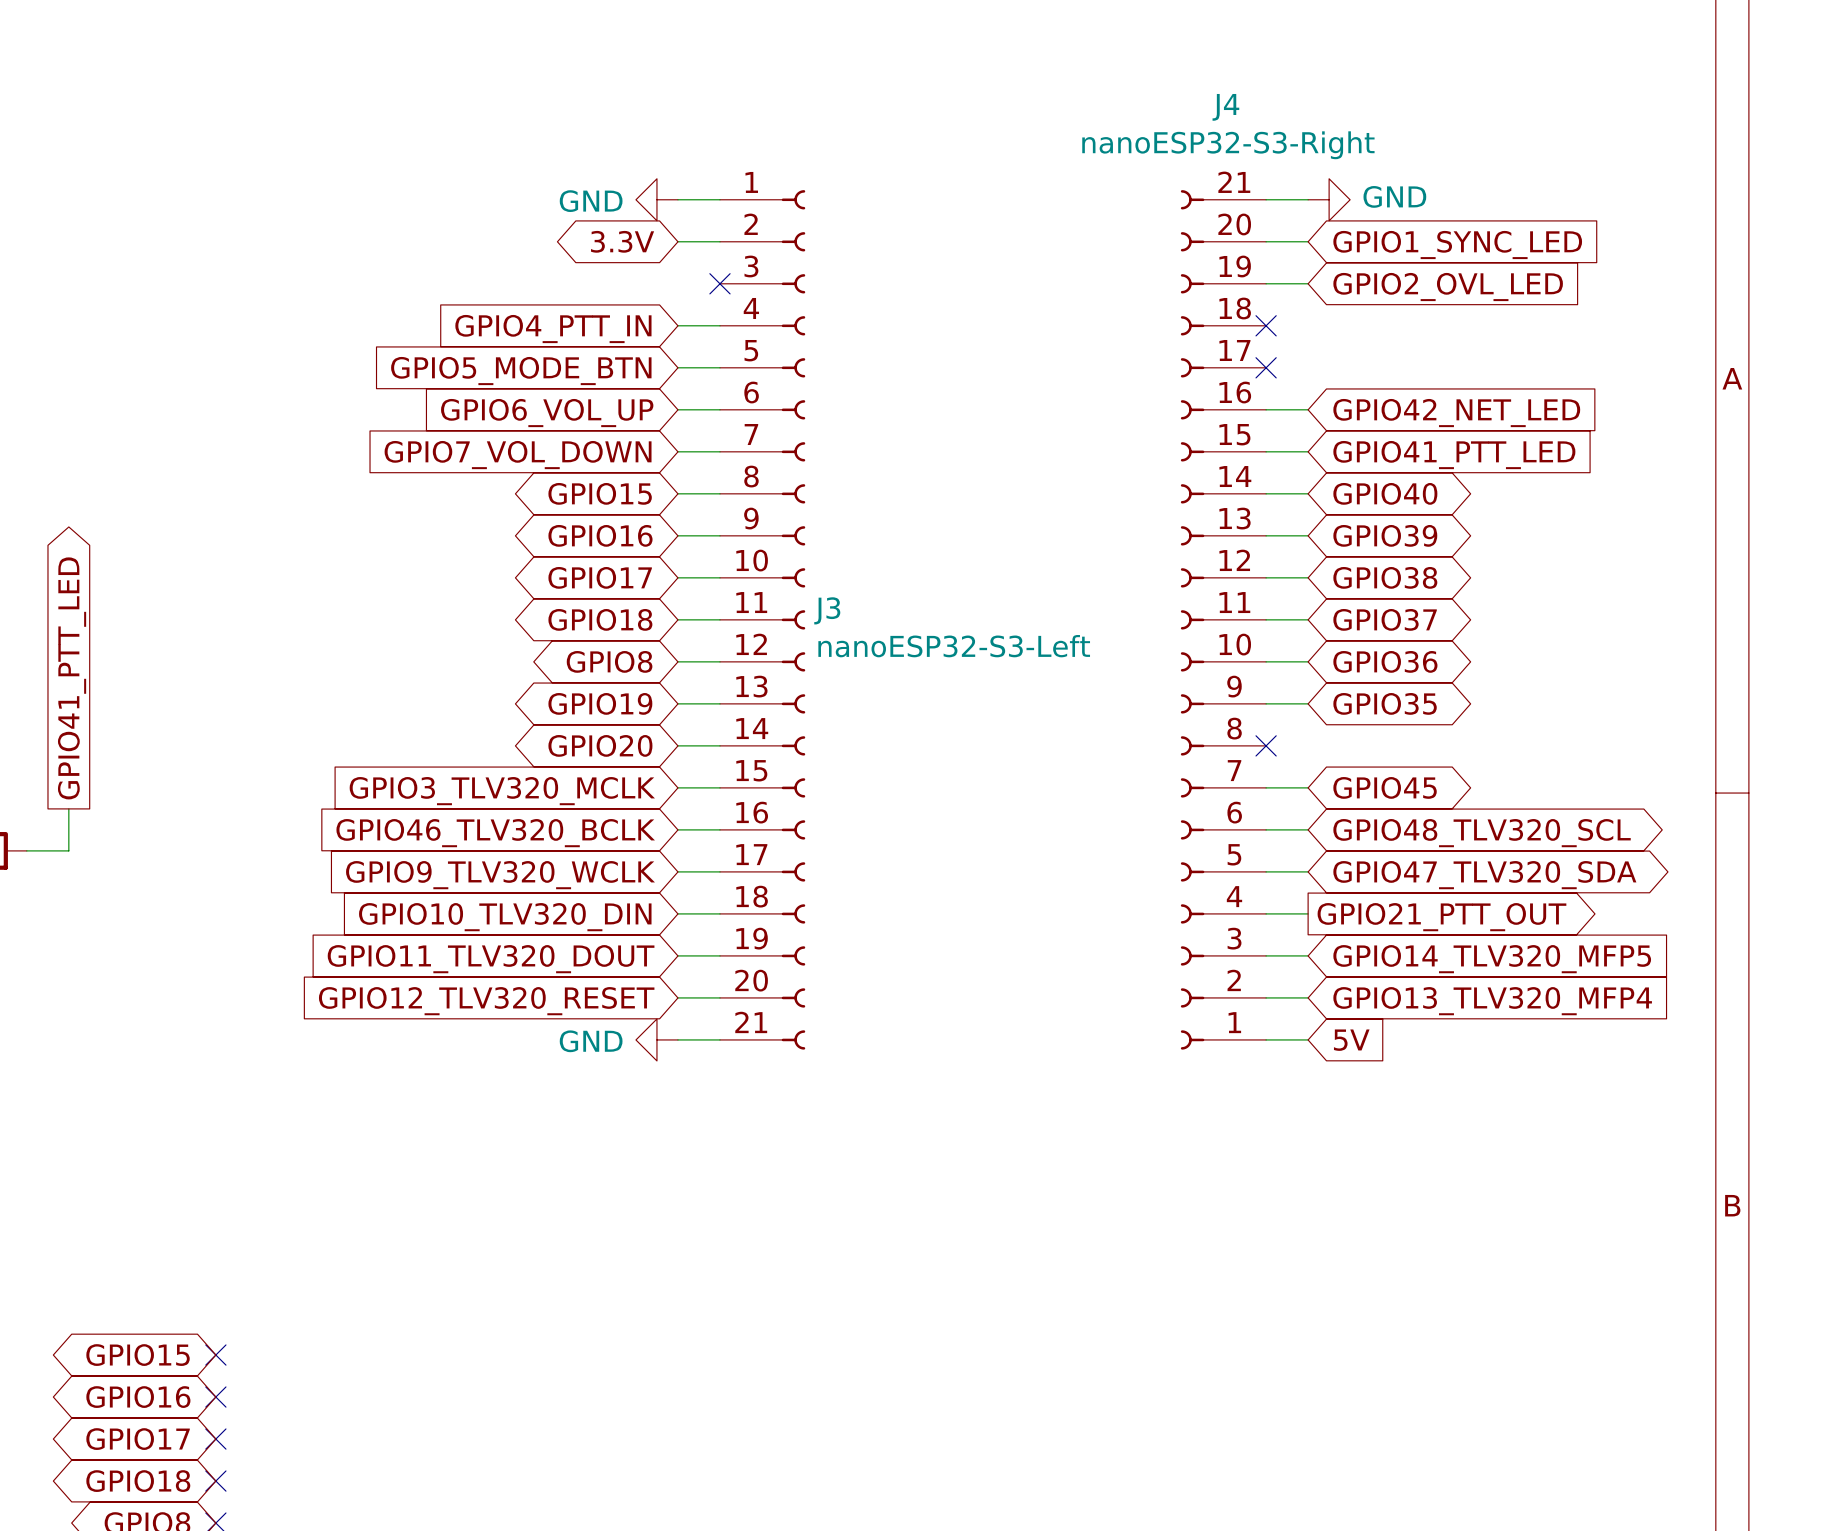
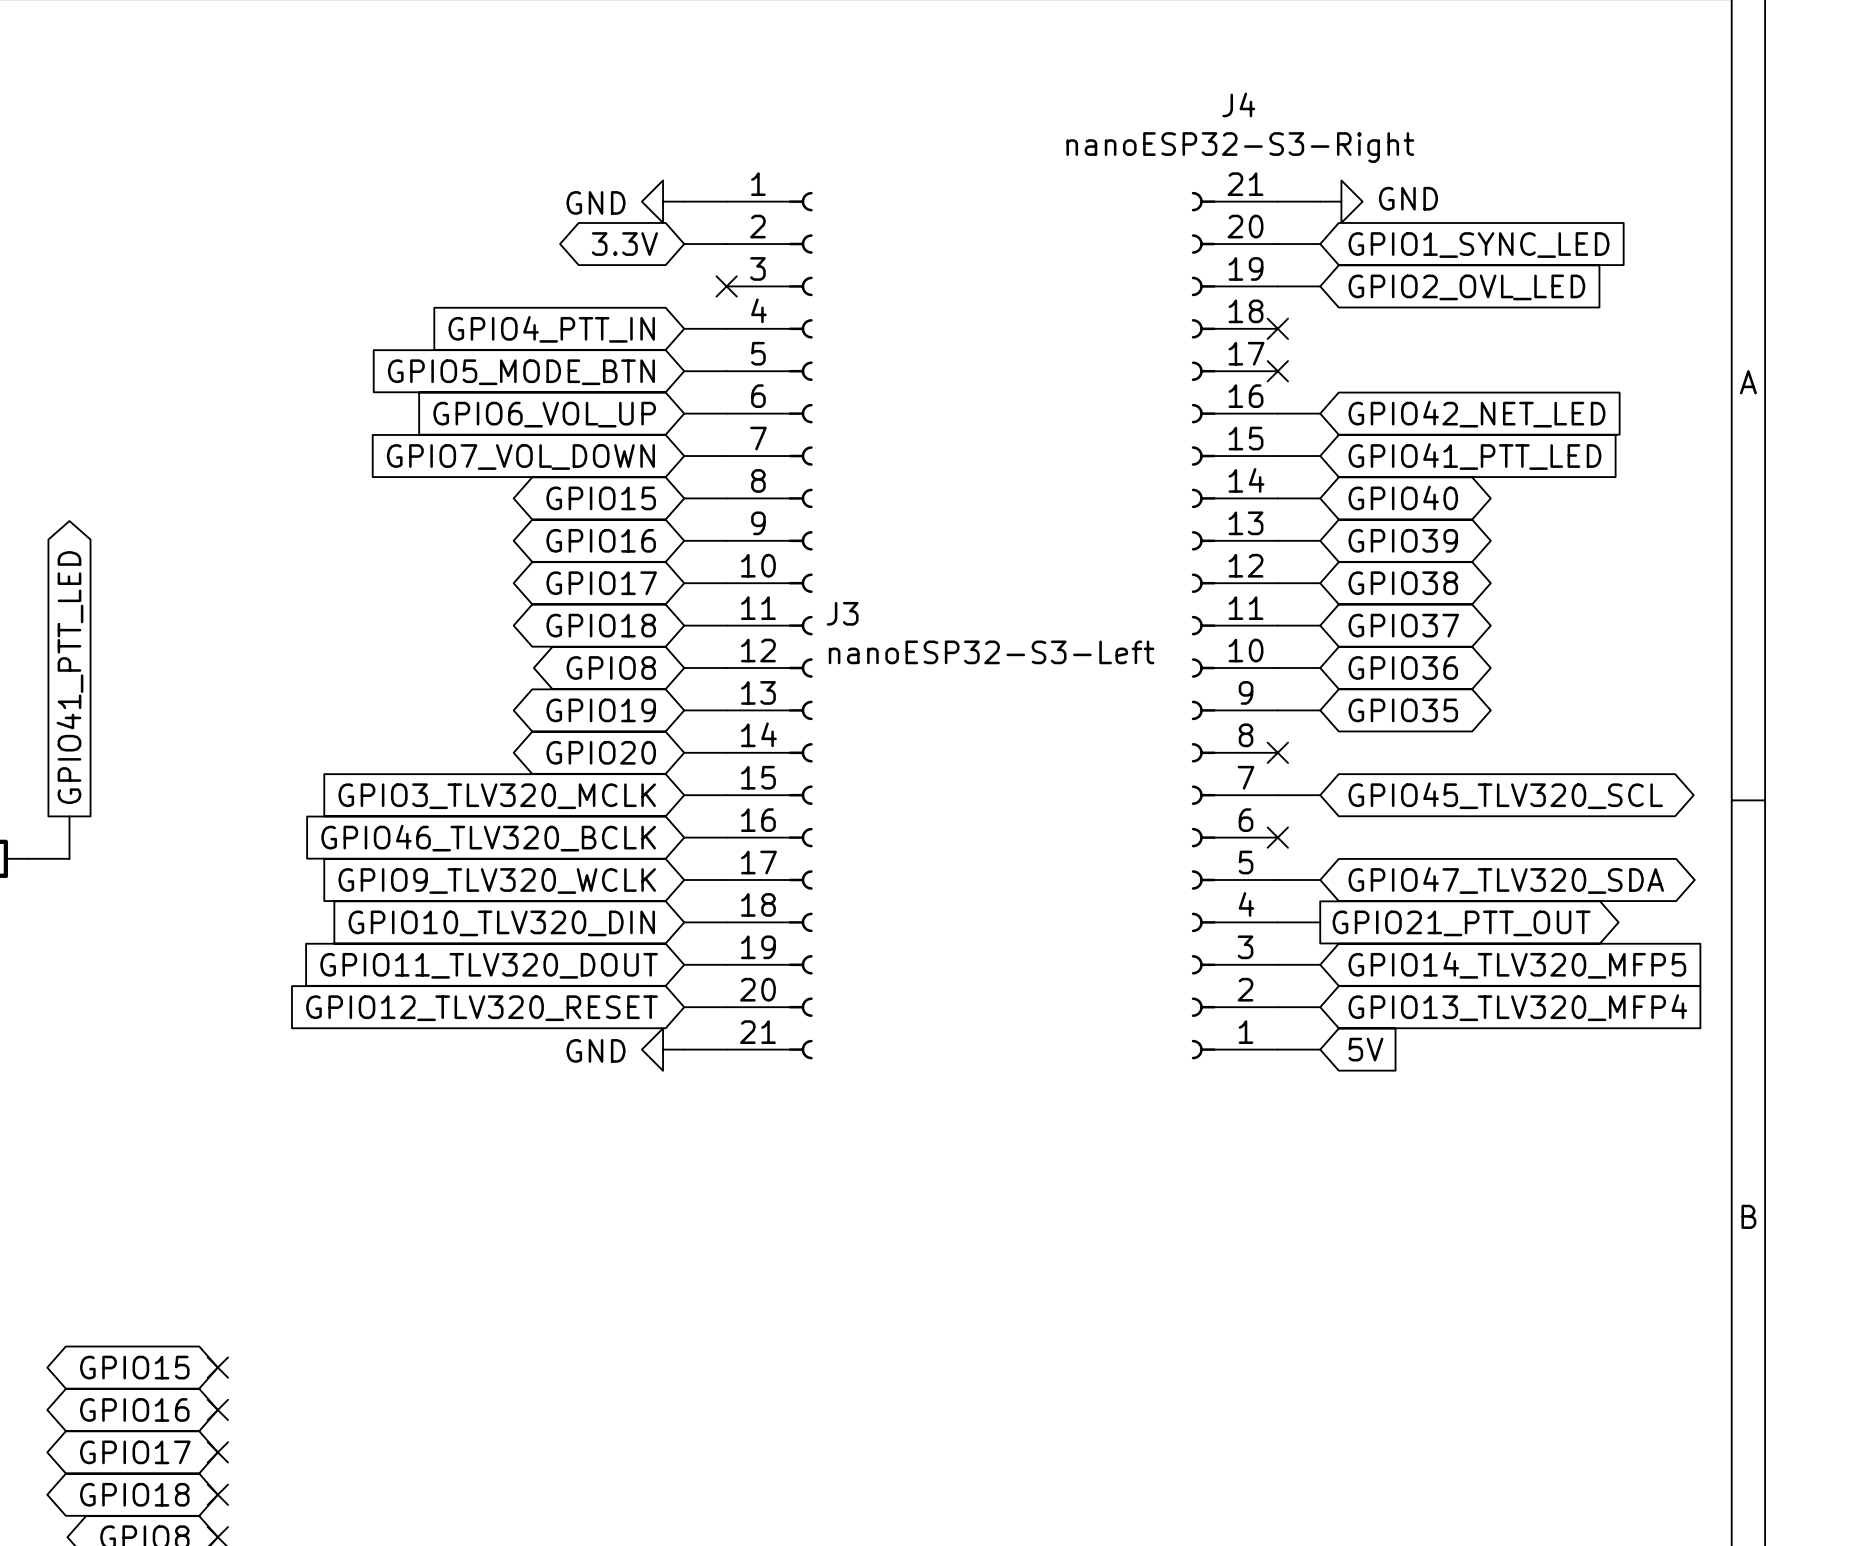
global label: GPIO45 (1385, 787) -> GPIO45_TLV320_SCL (1505, 795)
wire: (1266, 829) (1308, 829) -> none
no-connect mark: none -> (1277, 837)
global label: GPIO48_TLV320_SCL (1482, 833) -> none

